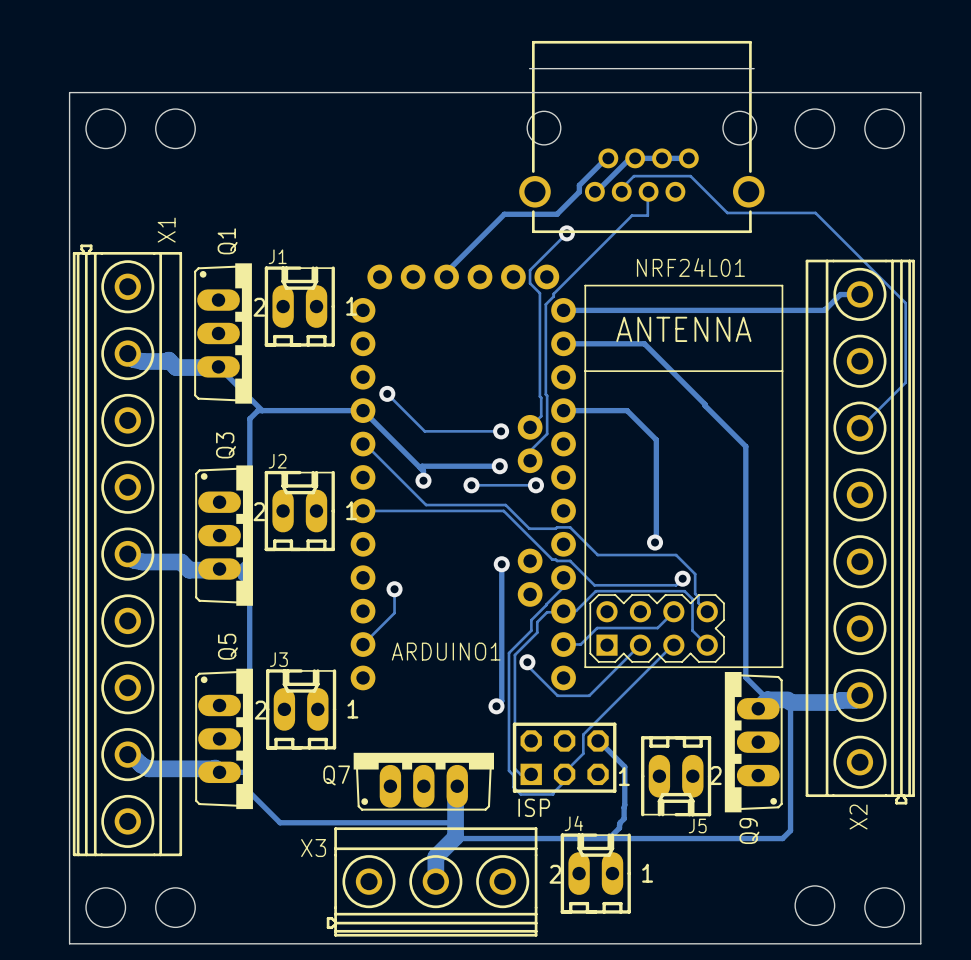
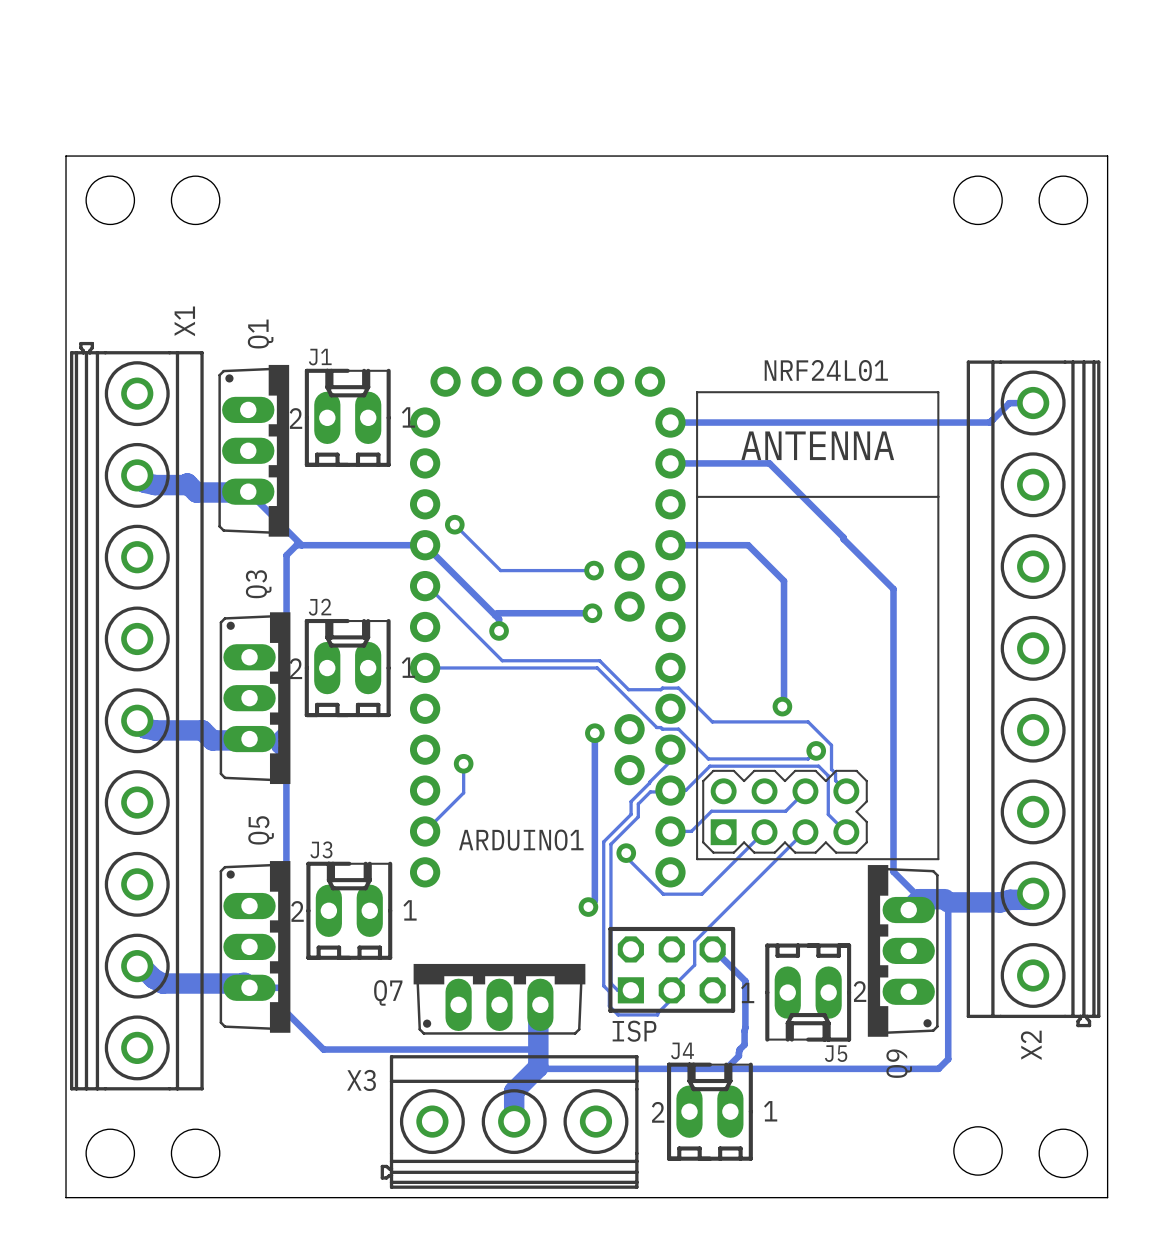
part: (641, 136) -> none
track: (608, 158) (579, 185) (579, 191) (557, 214) (504, 214) (447, 271) (446, 276) -> none
track: (688, 158) (629, 159) (594, 191) -> none
track: (621, 191) (622, 187) (633, 176) (690, 176) (727, 212) (815, 212) (905, 303) (905, 382) (859, 428) -> none
track: (648, 191) (647, 215) (632, 215) (553, 293) (553, 296) (545, 304) (547, 433) (530, 450) (530, 460) -> none
track: (566, 233) (530, 270) (530, 283) (539, 293) (541, 397) (541, 416) (530, 427) -> none
via: (566, 233) -> none
via: (471, 485) -> none
track: (535, 485) (471, 485) -> none
via: (535, 485) -> none

